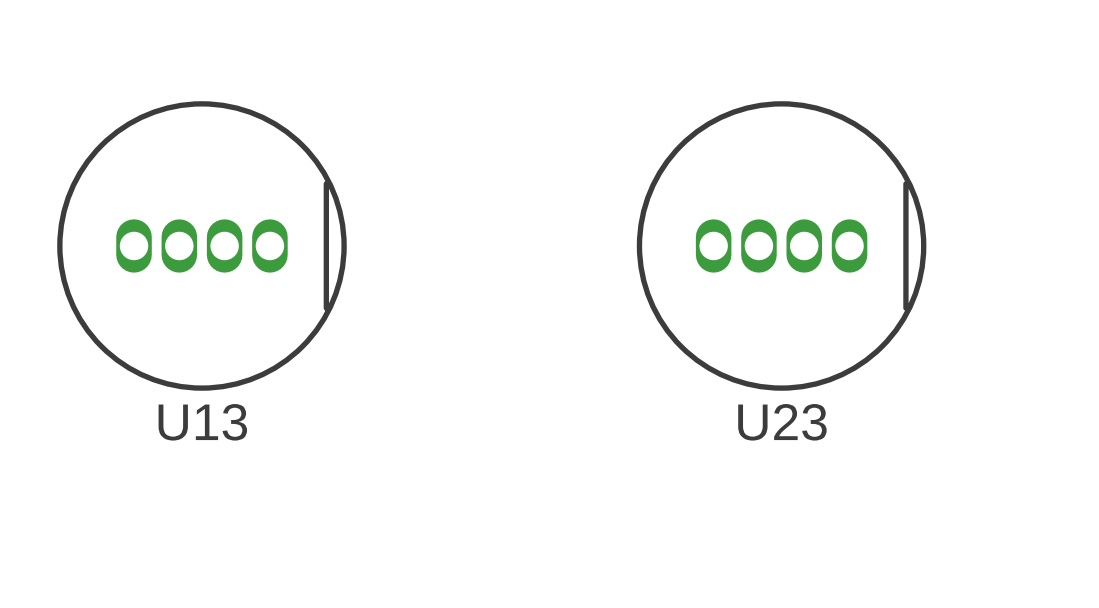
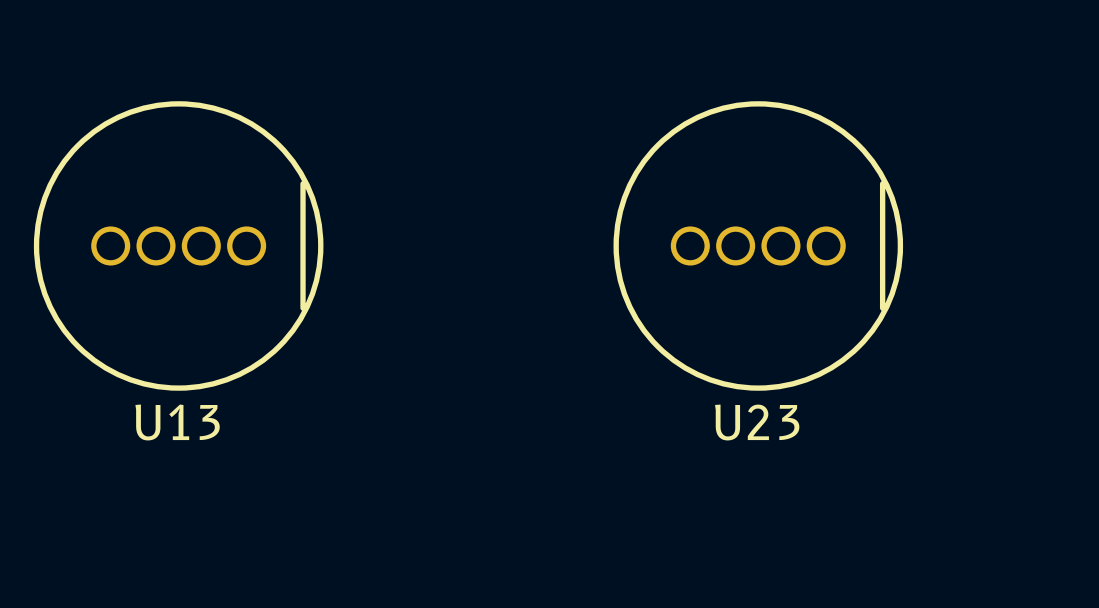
U13 footprint: [57, 101, 347, 391] -> [33, 101, 324, 391]
U23 footprint: [636, 101, 927, 391] -> [613, 101, 904, 391]

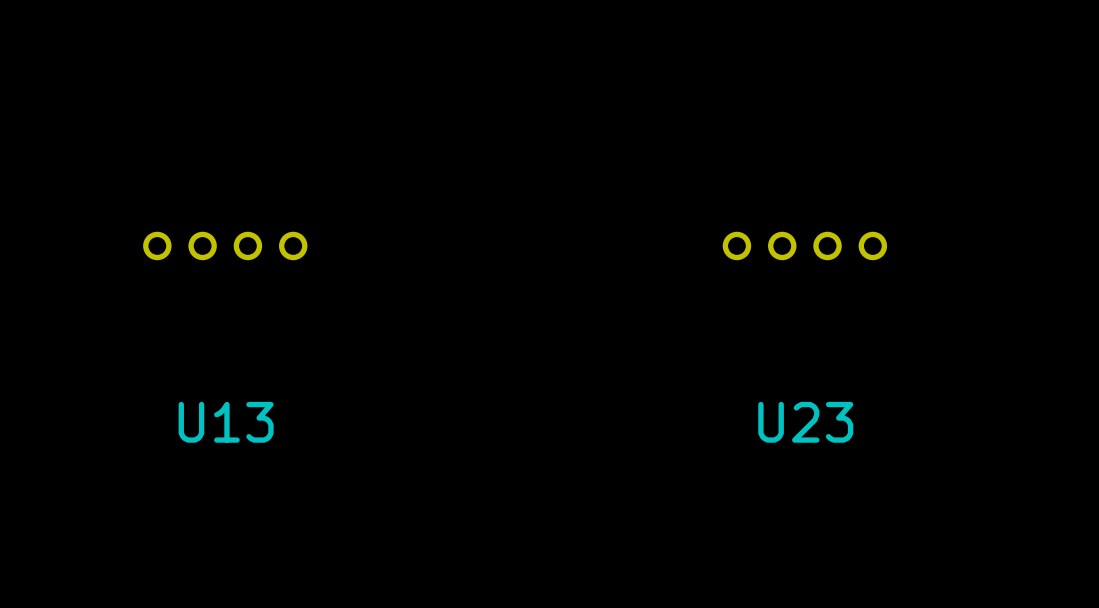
U13 footprint: [33, 101, 324, 391] -> [143, 231, 308, 261]
U23 footprint: [613, 101, 904, 391] -> [722, 231, 888, 261]

